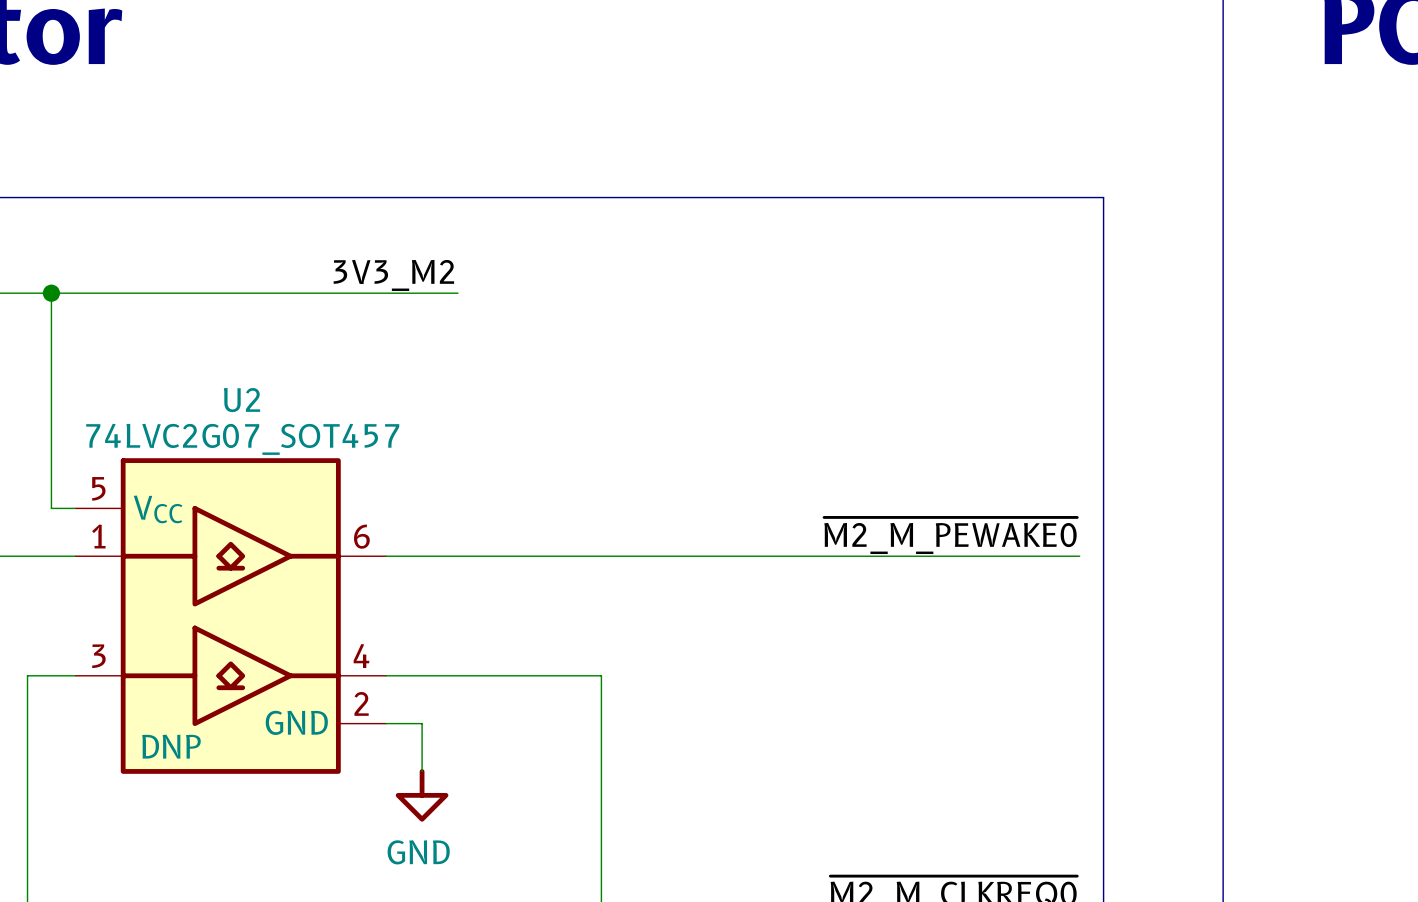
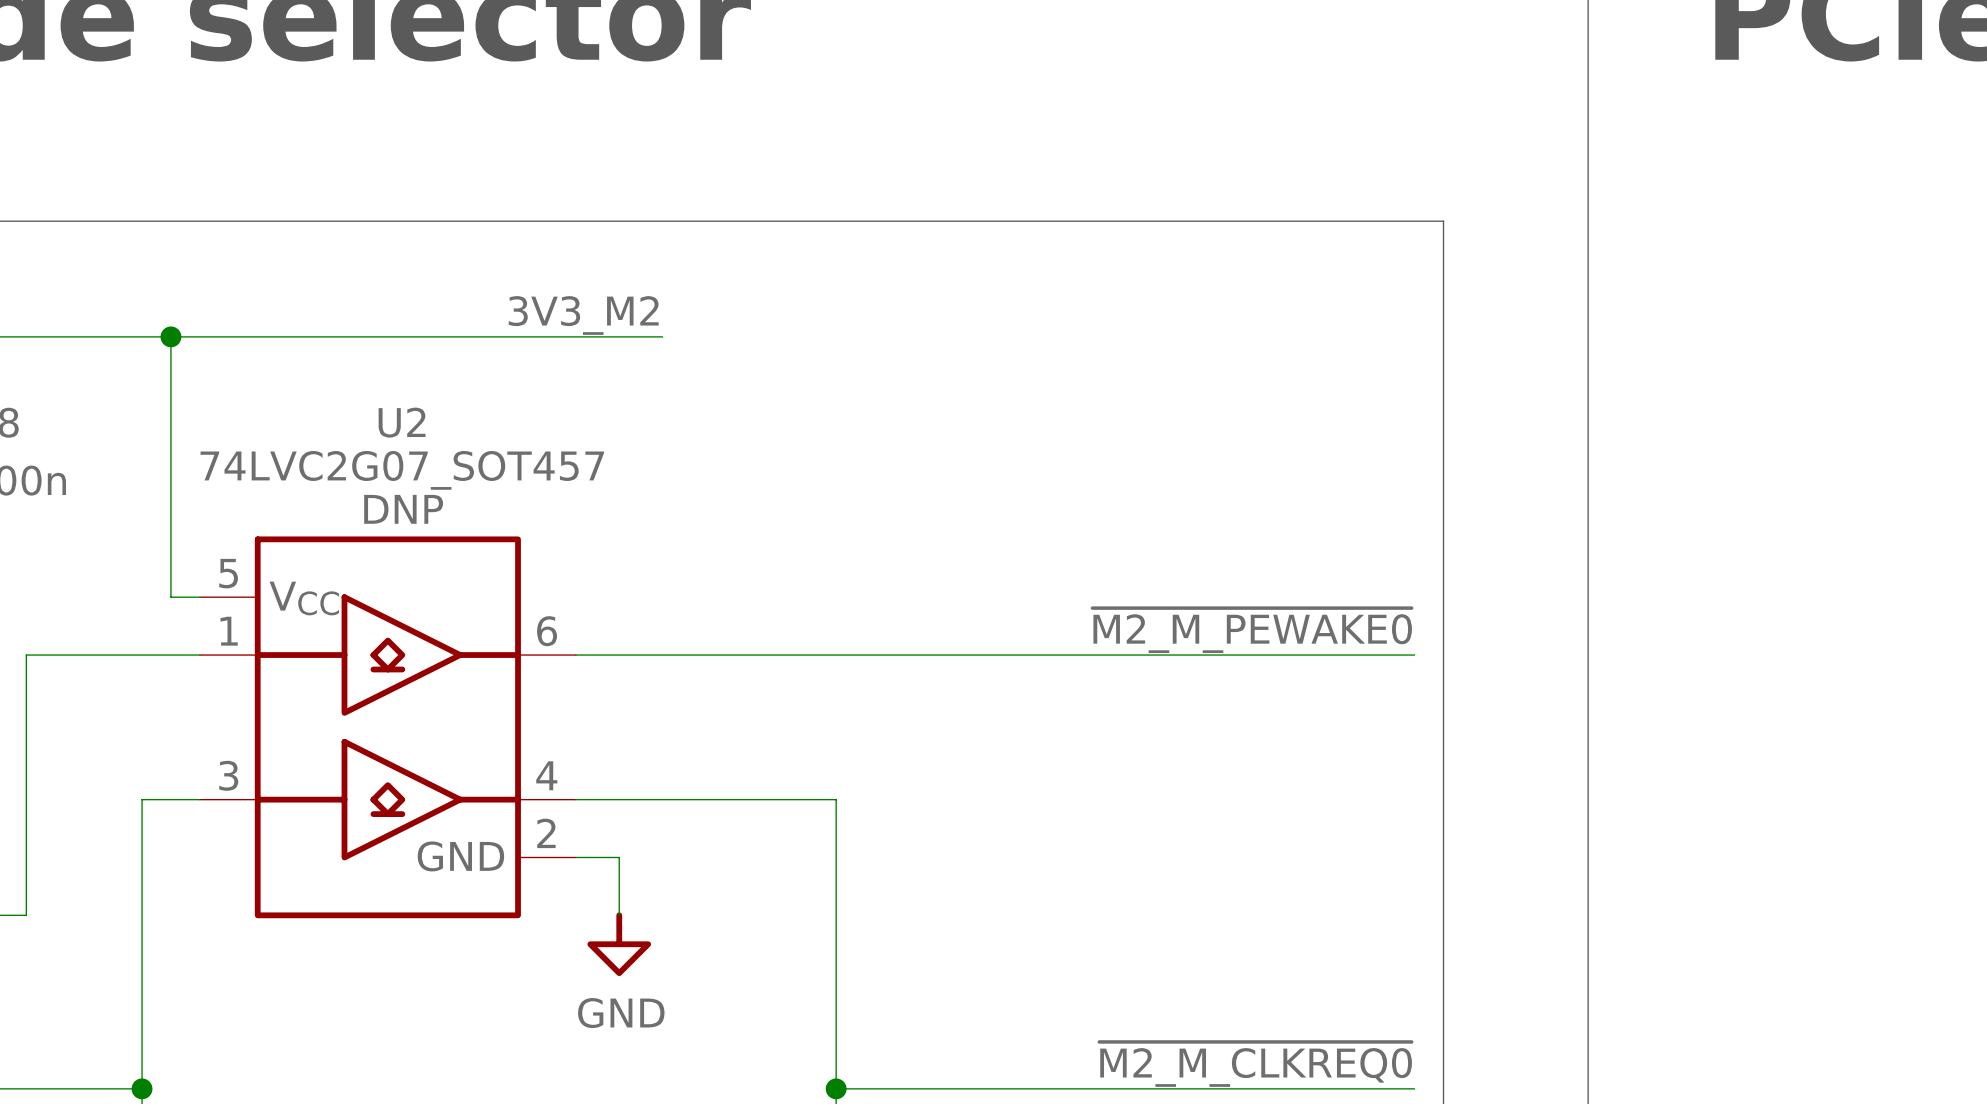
U2 name position: U2 (241, 400) -> U2 (402, 422)
U2 value position: 74LVC2G07_SOT457 (242, 439) -> 74LVC2G07_SOT457 (402, 470)
U2 text position: DNP (171, 746) -> DNP (403, 509)

